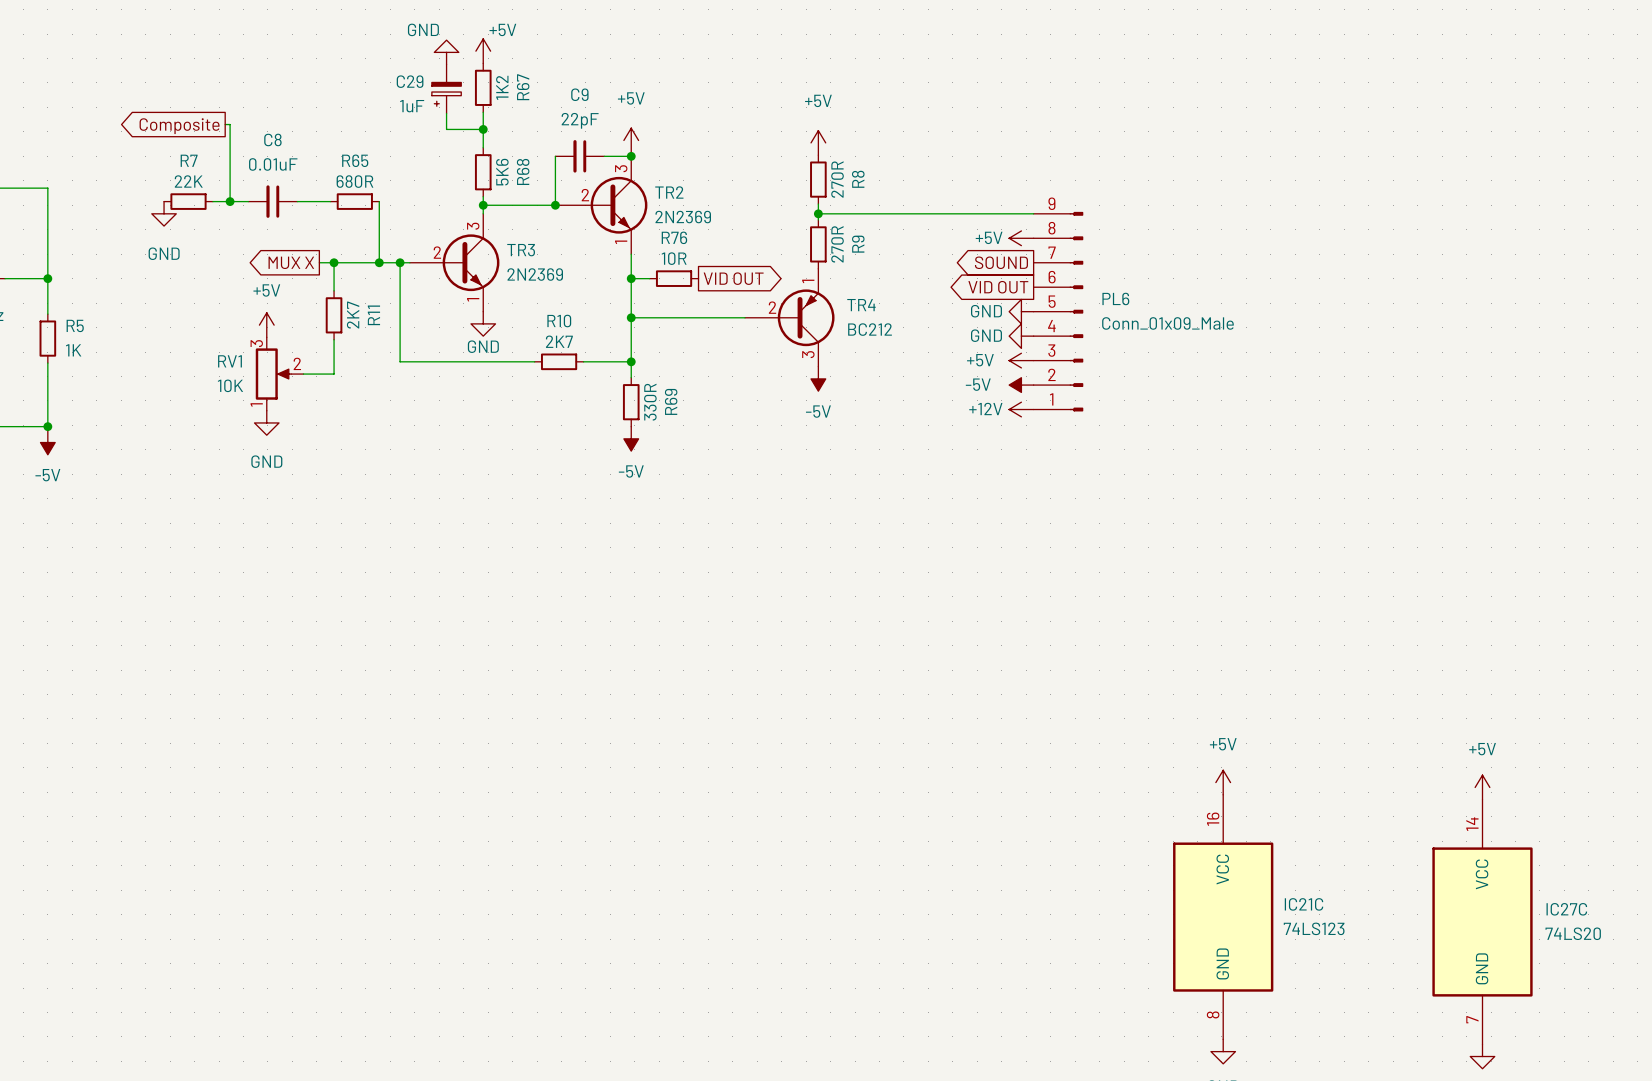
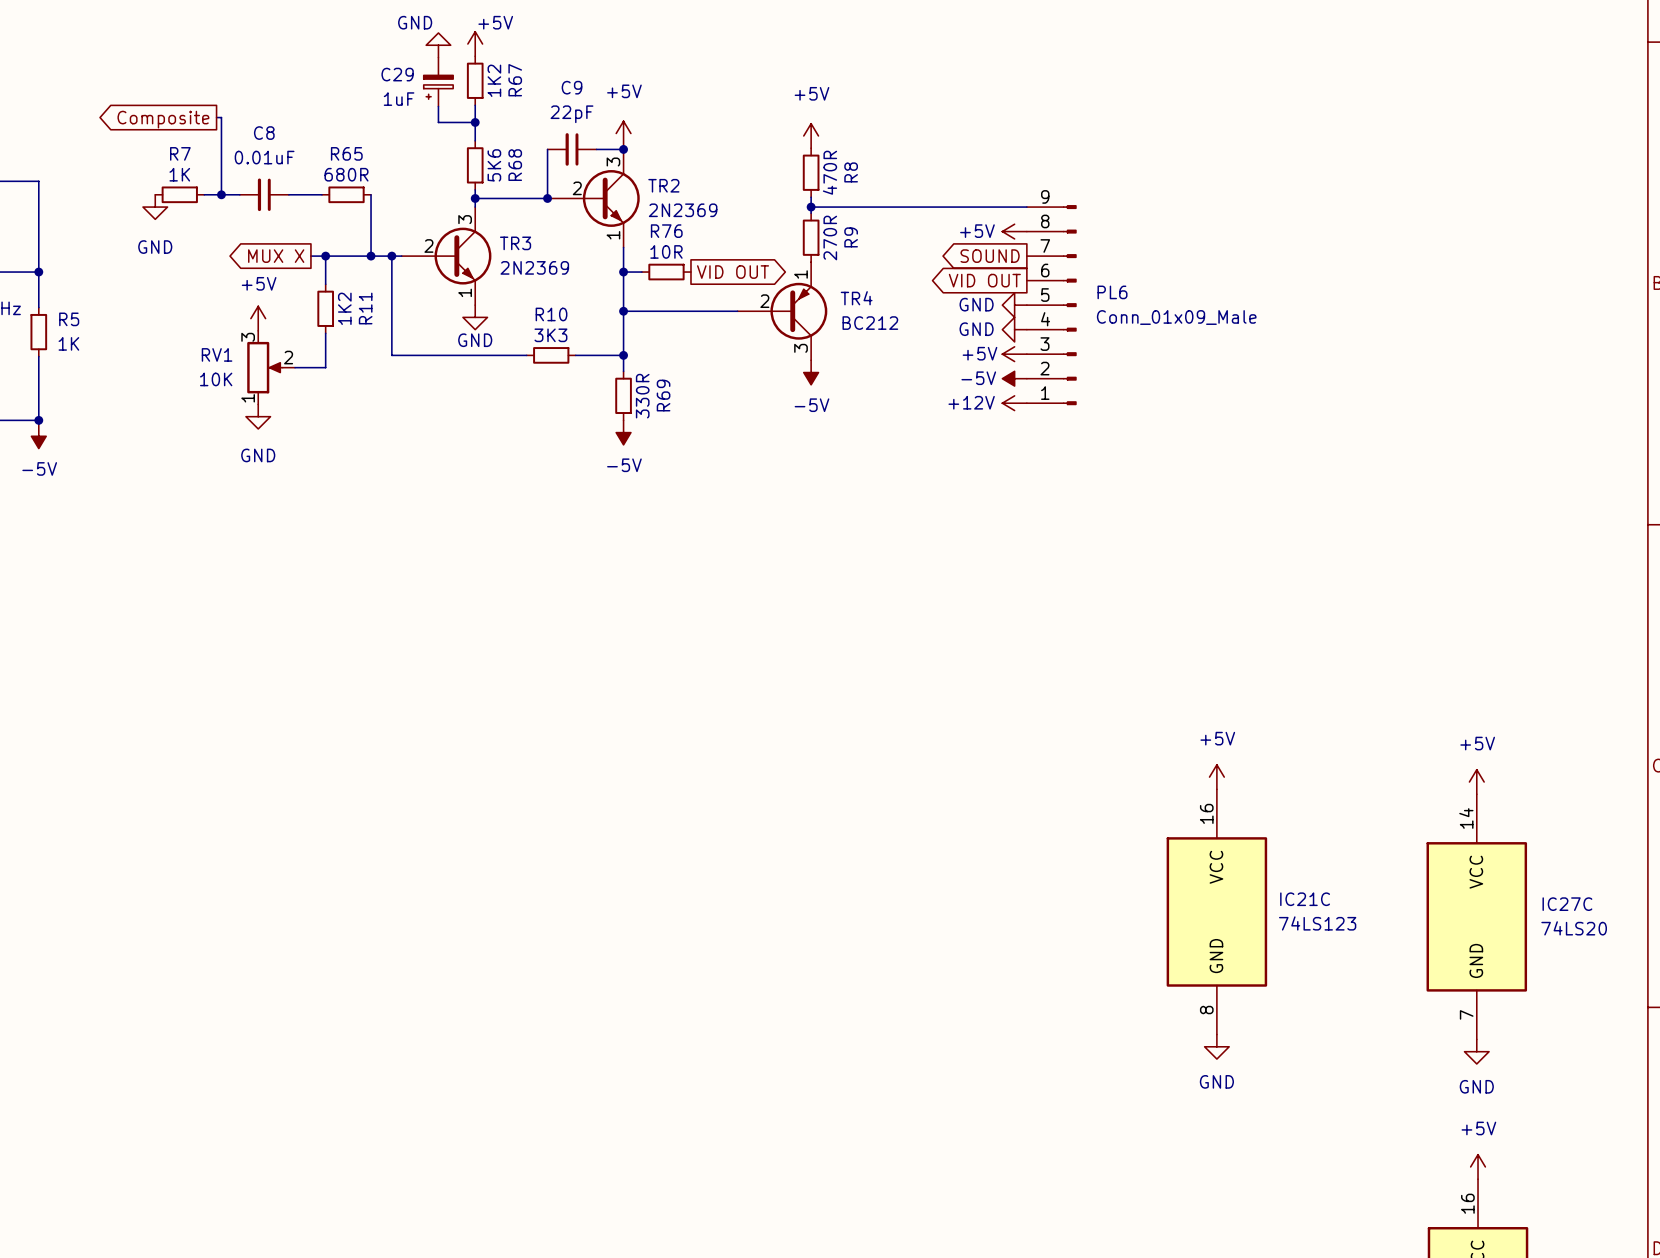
R8 value: 270R (837, 179) -> 470R (829, 172)
R7 value: 22K (188, 181) -> 1K (179, 174)
R11 value: 2K7 (353, 315) -> 1K2 (344, 308)
R10 value: 2K7 (559, 341) -> 3K3 (550, 335)

